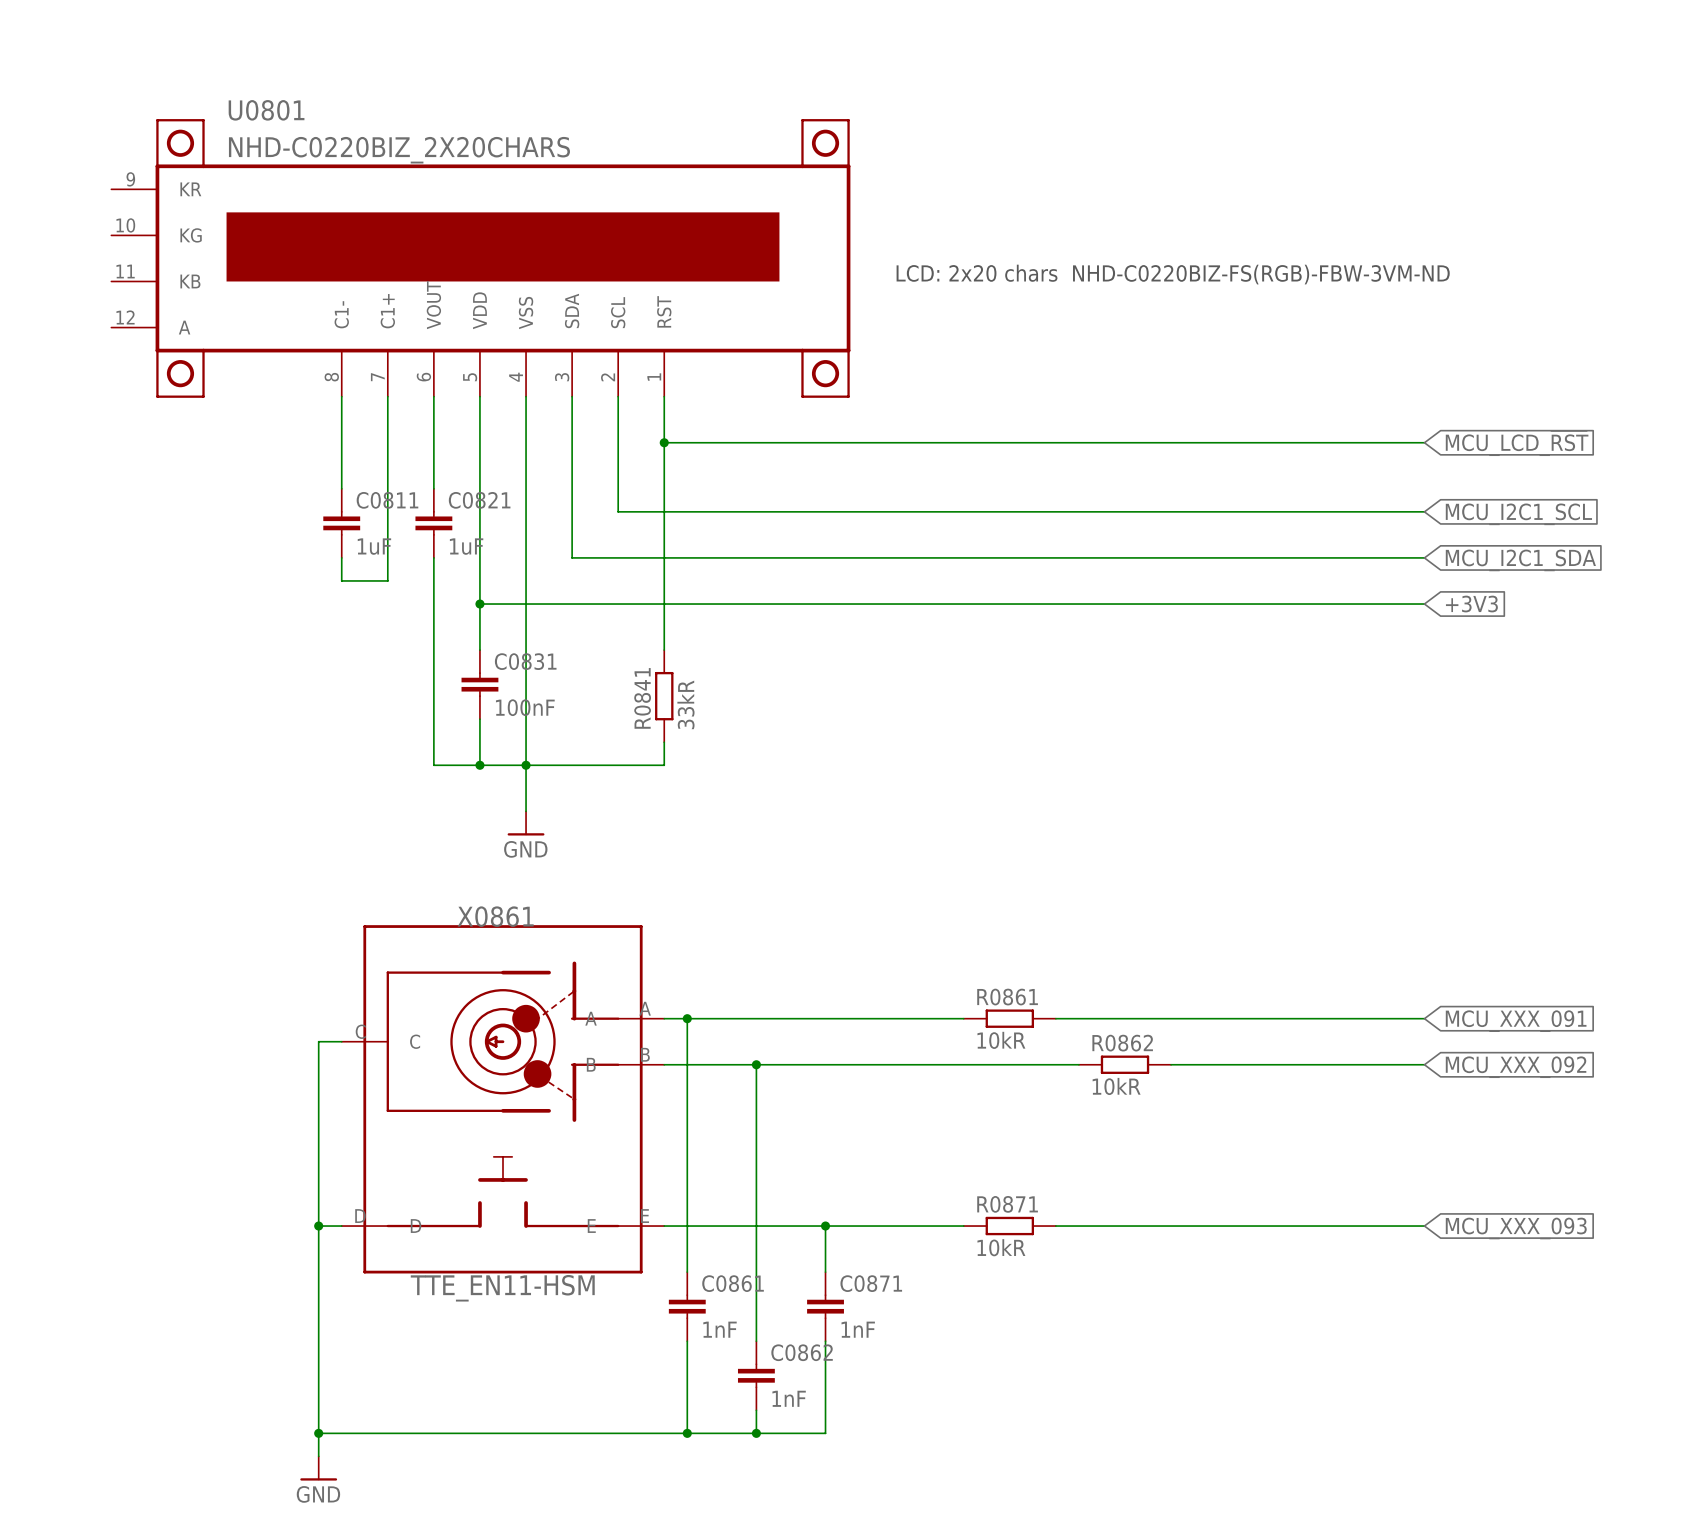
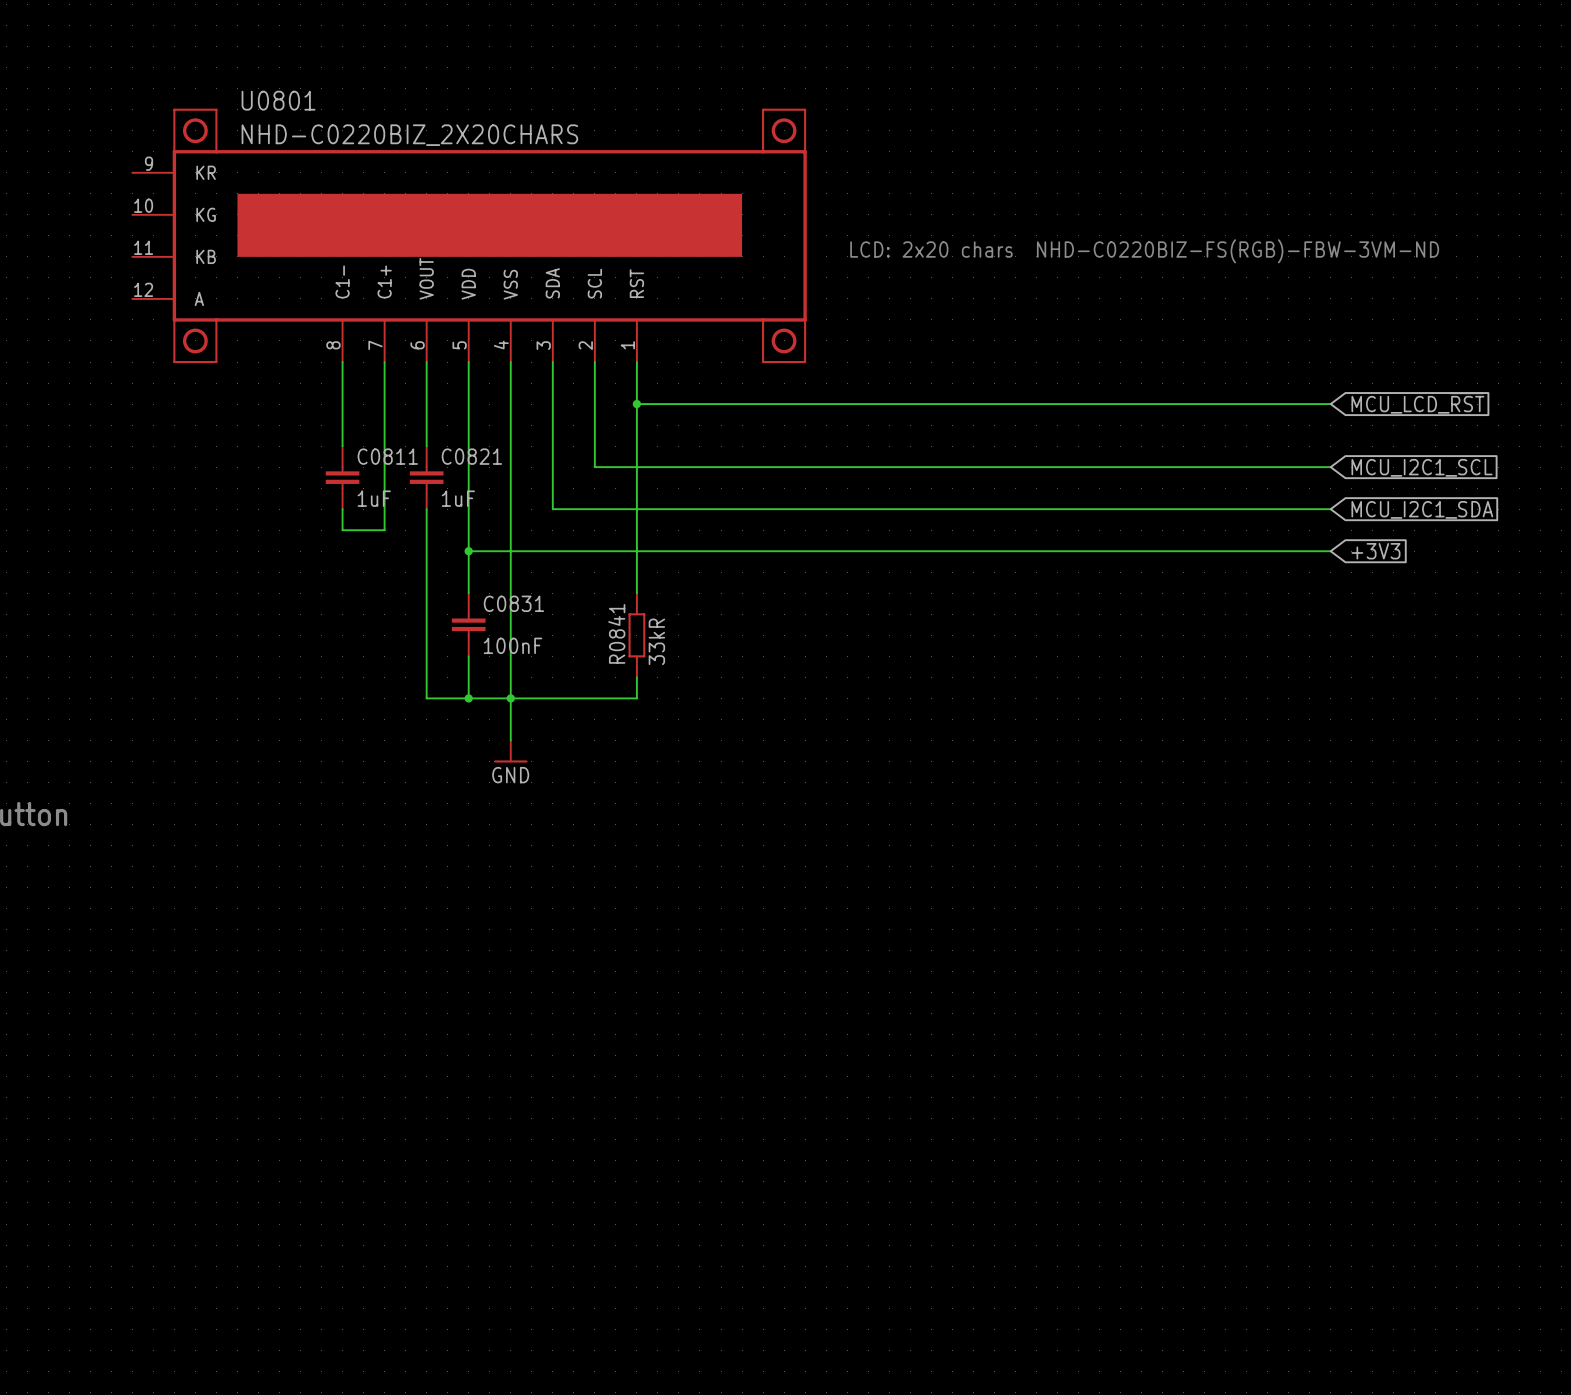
wire: (664, 1018) (963, 1018) -> none
wire: (687, 1018) (687, 1272) -> none
junction: (687, 1018) -> none
R0861: 10kR (1009, 1018) -> none
wire: (1055, 1018) (1424, 1018) -> none
global label: MCU_XXX_091 (1516, 1021) -> none
wire: (341, 1041) (318, 1041) (318, 1456) -> none
wire: (664, 1064) (1078, 1064) -> none
wire: (756, 1064) (756, 1341) -> none
junction: (756, 1064) -> none
R0862: 10kR (1125, 1064) -> none
wire: (1171, 1064) (1424, 1064) -> none
global label: MCU_XXX_092 (1516, 1067) -> none
X0861: TTE_EN11-HSM (502, 1099) -> none
wire: (318, 1226) (341, 1226) -> none
junction: (318, 1226) -> none
wire: (664, 1226) (963, 1226) -> none
wire: (825, 1226) (825, 1272) -> none
junction: (825, 1226) -> none
R0871: 10kR (1009, 1226) -> none
wire: (1055, 1226) (1424, 1226) -> none
global label: MCU_XXX_093 (1516, 1228) -> none
C0861: 1nF (687, 1306) -> none
C0871: 1nF (825, 1306) -> none
wire: (687, 1341) (687, 1433) -> none
wire: (825, 1341) (825, 1433) (318, 1433) -> none
C0862: 1nF (756, 1375) -> none
wire: (756, 1410) (756, 1433) -> none
junction: (318, 1433) -> none
junction: (687, 1433) -> none
junction: (756, 1433) -> none
power symbol: GND (318, 1468) -> none

